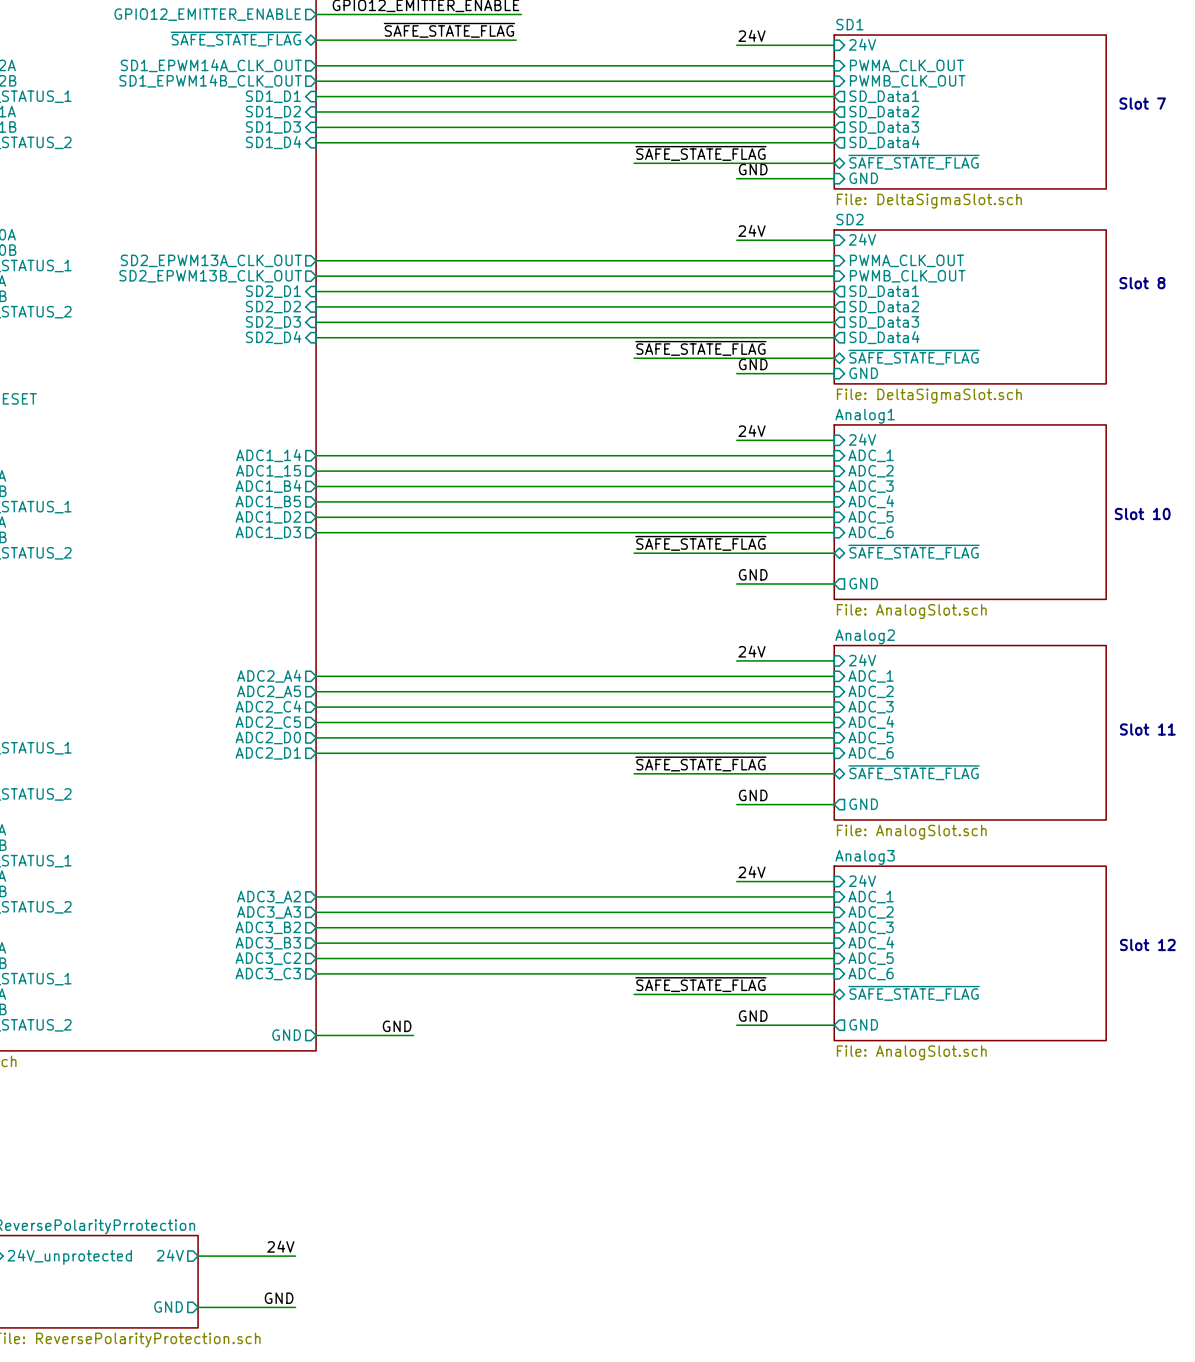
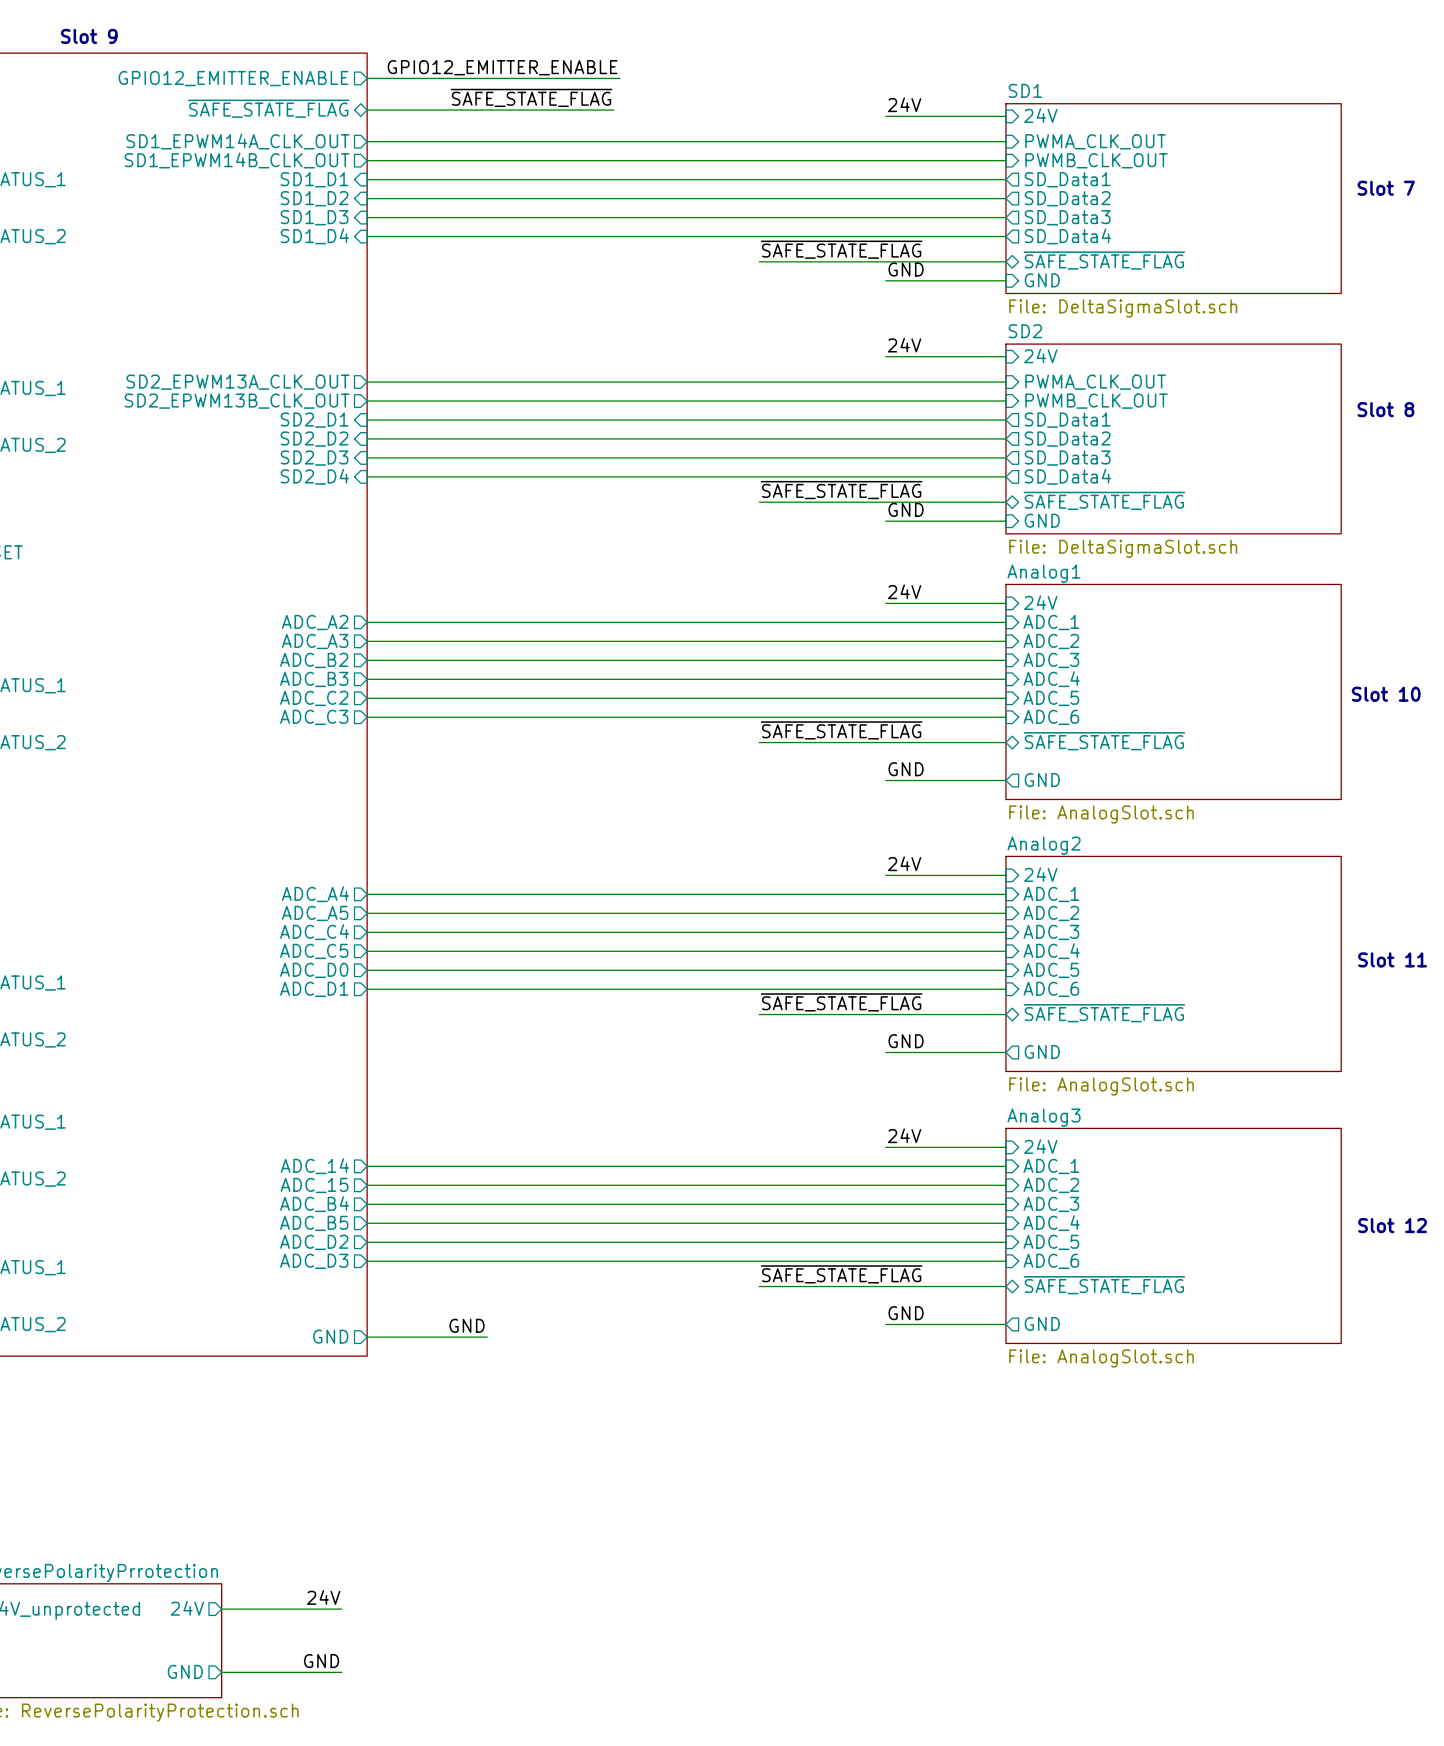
sheet pin: ADC1_14 (268, 455) -> ADC_A2 (315, 622)
sheet pin: ADC1_15 (268, 471) -> ADC_A3 (315, 641)
sheet pin: ADC1_B4 (268, 486) -> ADC_B2 (314, 660)
sheet pin: ADC1_B5 (268, 502) -> ADC_B3 (314, 679)
sheet pin: ADC1_D2 (268, 517) -> ADC_C2 (314, 698)
sheet pin: ADC1_D3 (268, 532) -> ADC_C3 (314, 717)
sheet pin: ADC2_A4 (269, 676) -> ADC_A4 (315, 894)
sheet pin: ADC2_A5 (269, 691) -> ADC_A5 (315, 913)
sheet pin: ADC2_C4 (268, 706) -> ADC_C4 (314, 932)
sheet pin: ADC2_C5 (268, 722) -> ADC_C5 (314, 951)
sheet pin: ADC2_D0 (268, 738) -> ADC_D0 (314, 970)
sheet pin: ADC2_D1 (268, 753) -> ADC_D1 (314, 989)
sheet pin: ADC3_A2 (269, 897) -> ADC_14 (314, 1166)
sheet pin: ADC3_A3 (269, 912) -> ADC_15 (314, 1185)
sheet pin: ADC3_B2 (268, 927) -> ADC_B4 (314, 1204)
sheet pin: ADC3_B3 (268, 943) -> ADC_B5 (314, 1223)
sheet pin: ADC3_C2 (268, 958) -> ADC_D2 (314, 1242)
sheet pin: ADC3_C3 (268, 974) -> ADC_D3 (314, 1261)

